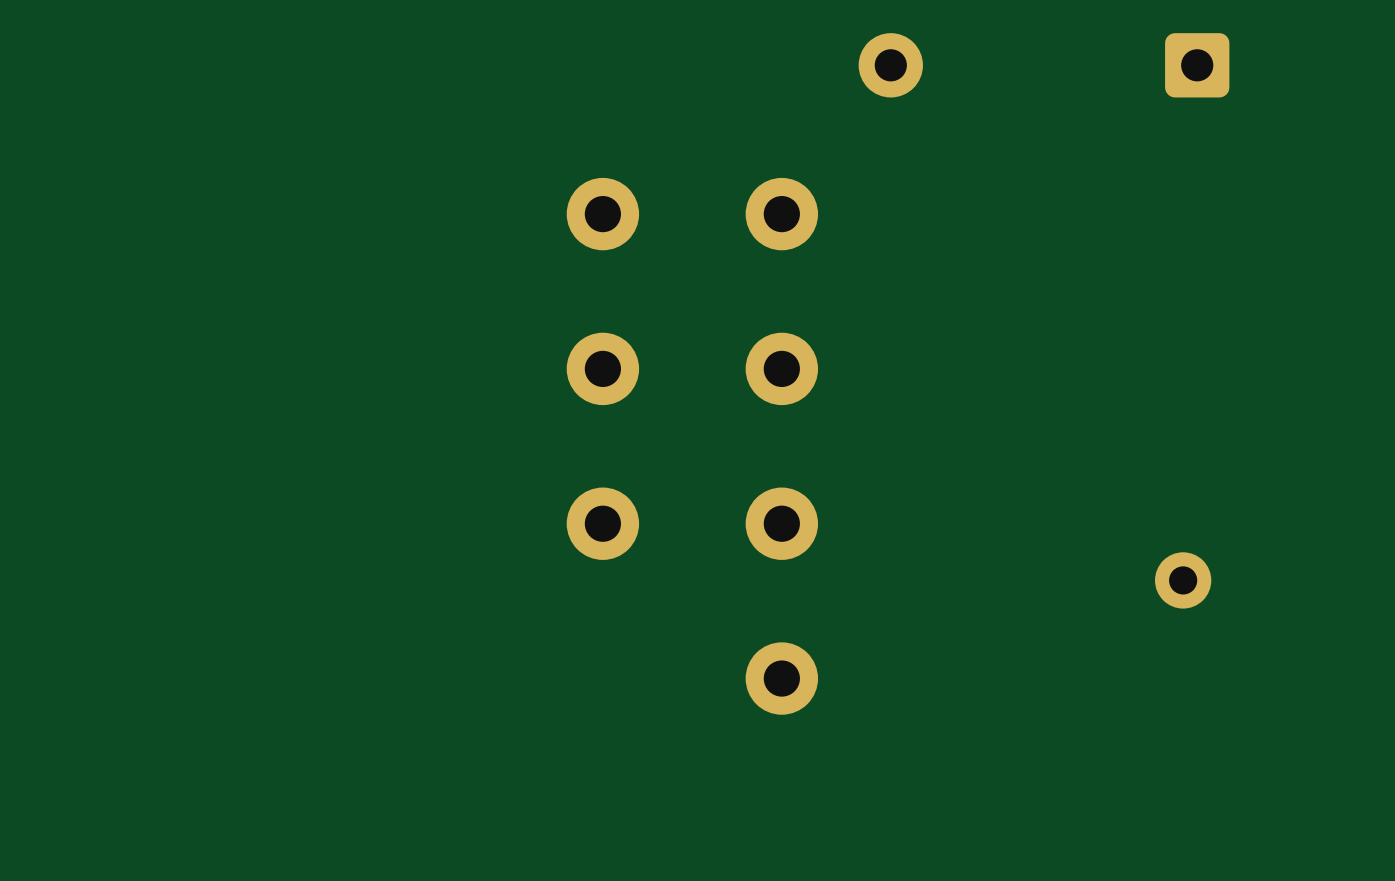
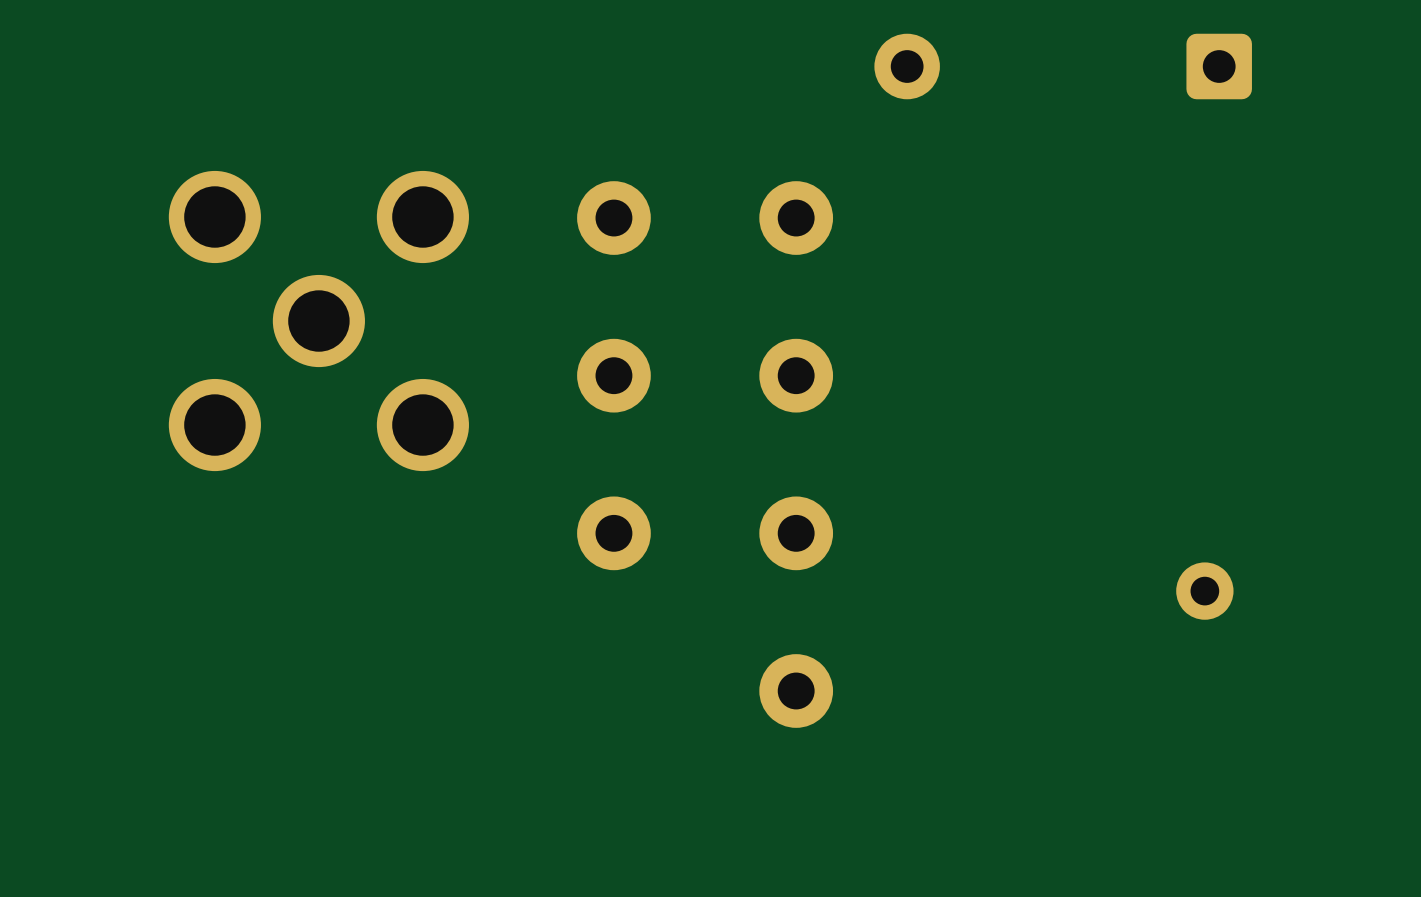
part: none -> (318, 321)

